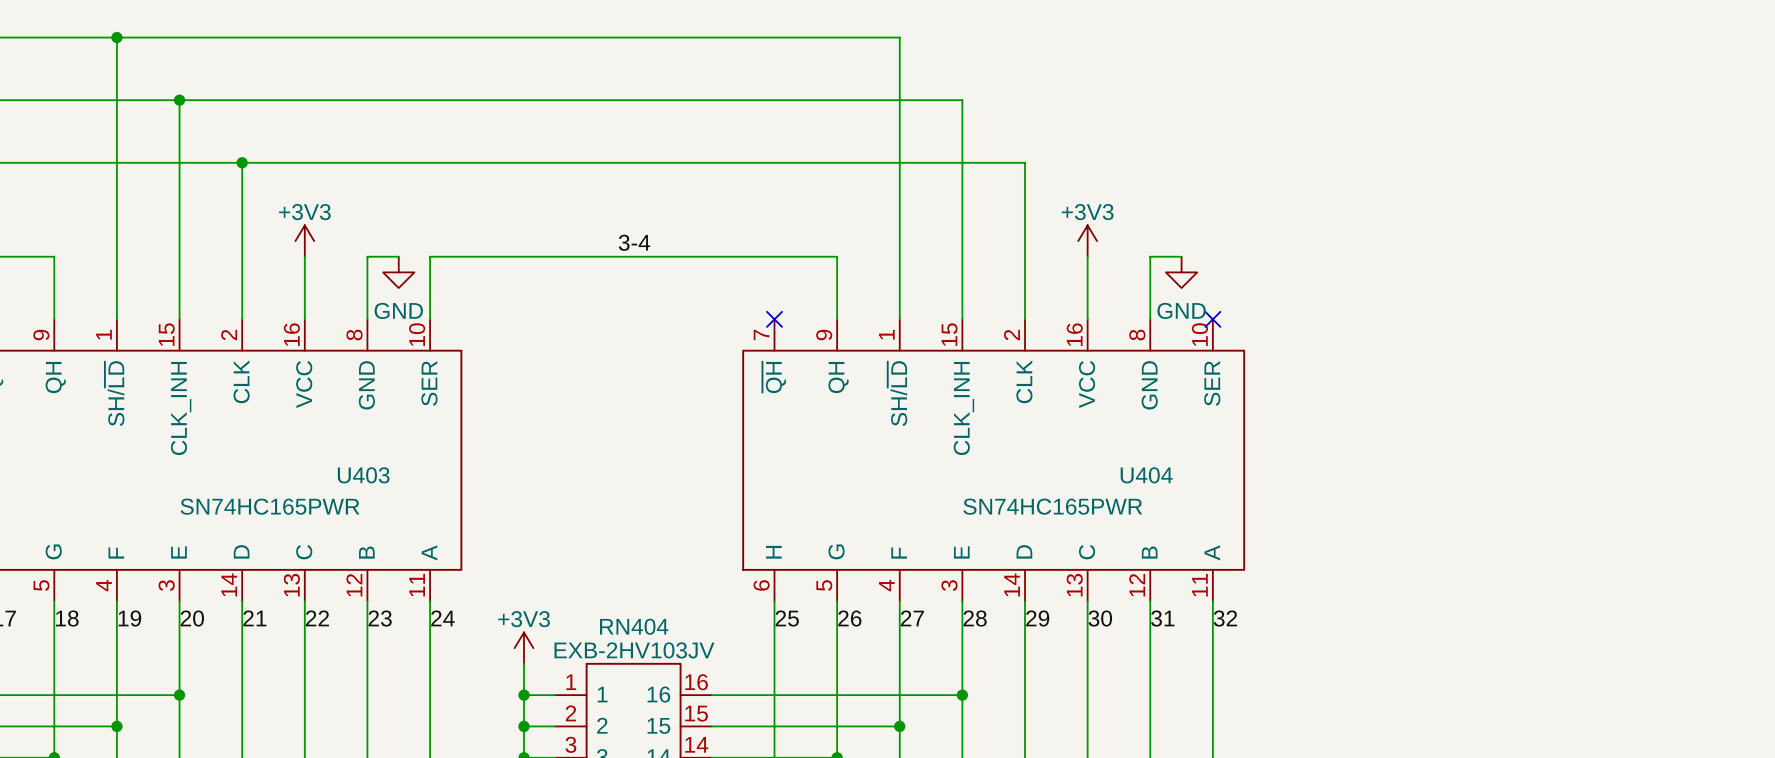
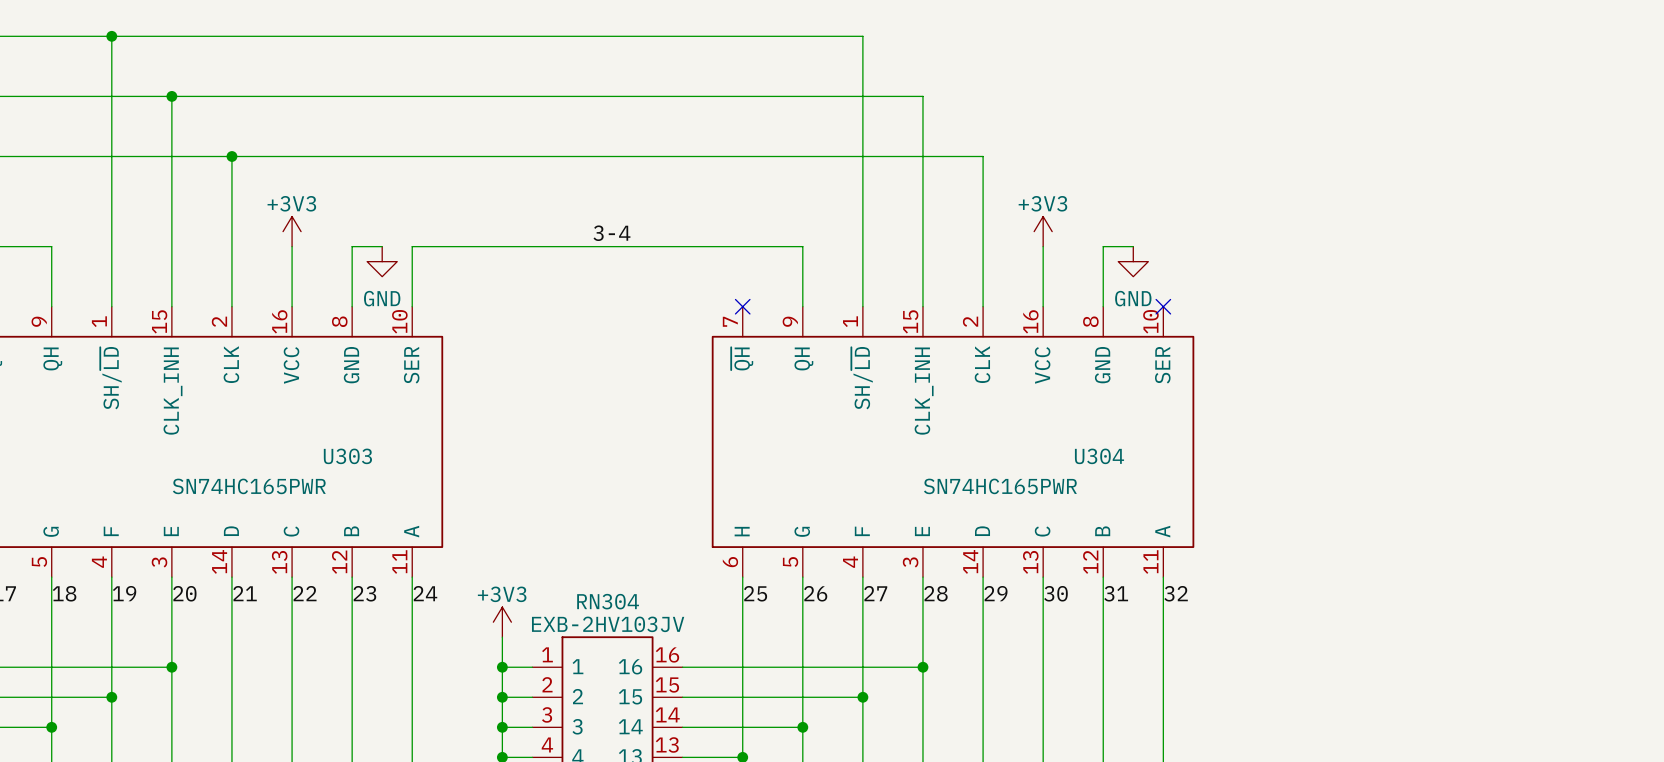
U403 name: U403 (363, 475) -> U303 (347, 456)
U404 name: U404 (1146, 475) -> U304 (1099, 456)
RN404 name: RN404 (634, 626) -> RN304 (608, 601)

